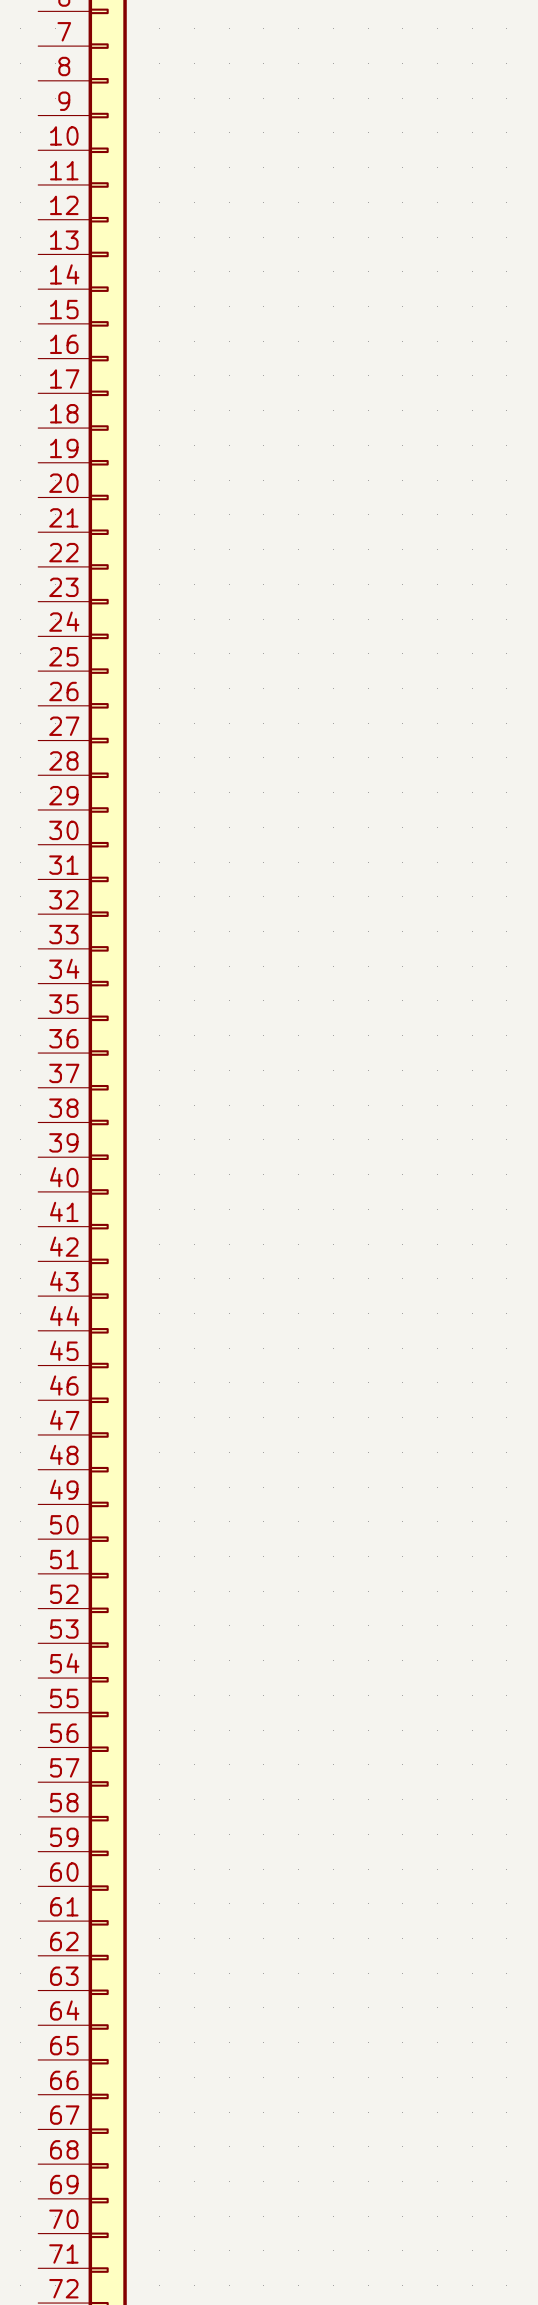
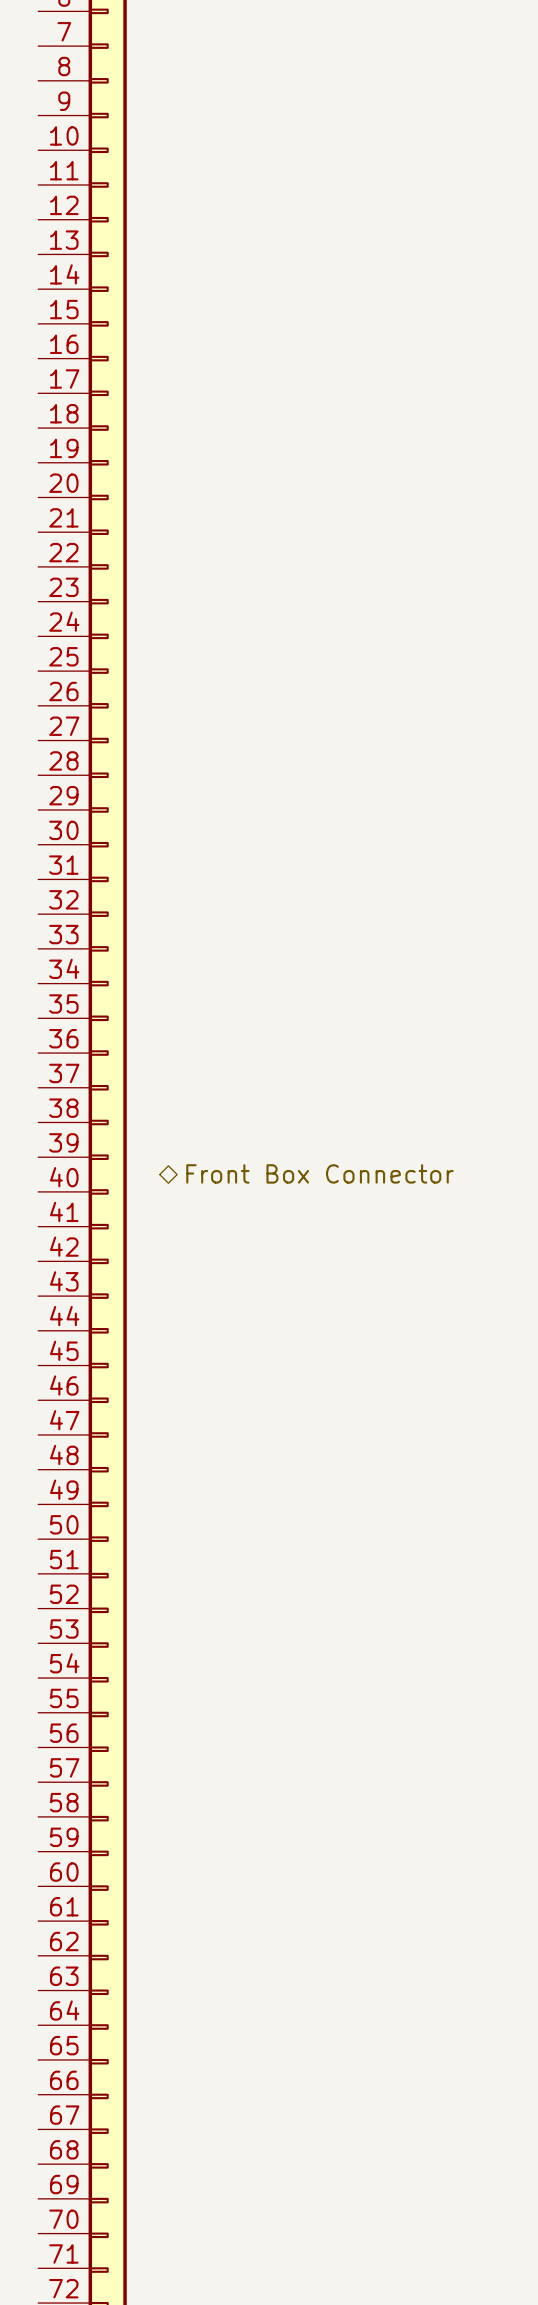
hierarchical label: none -> Front Box Connector (320, 1173)

